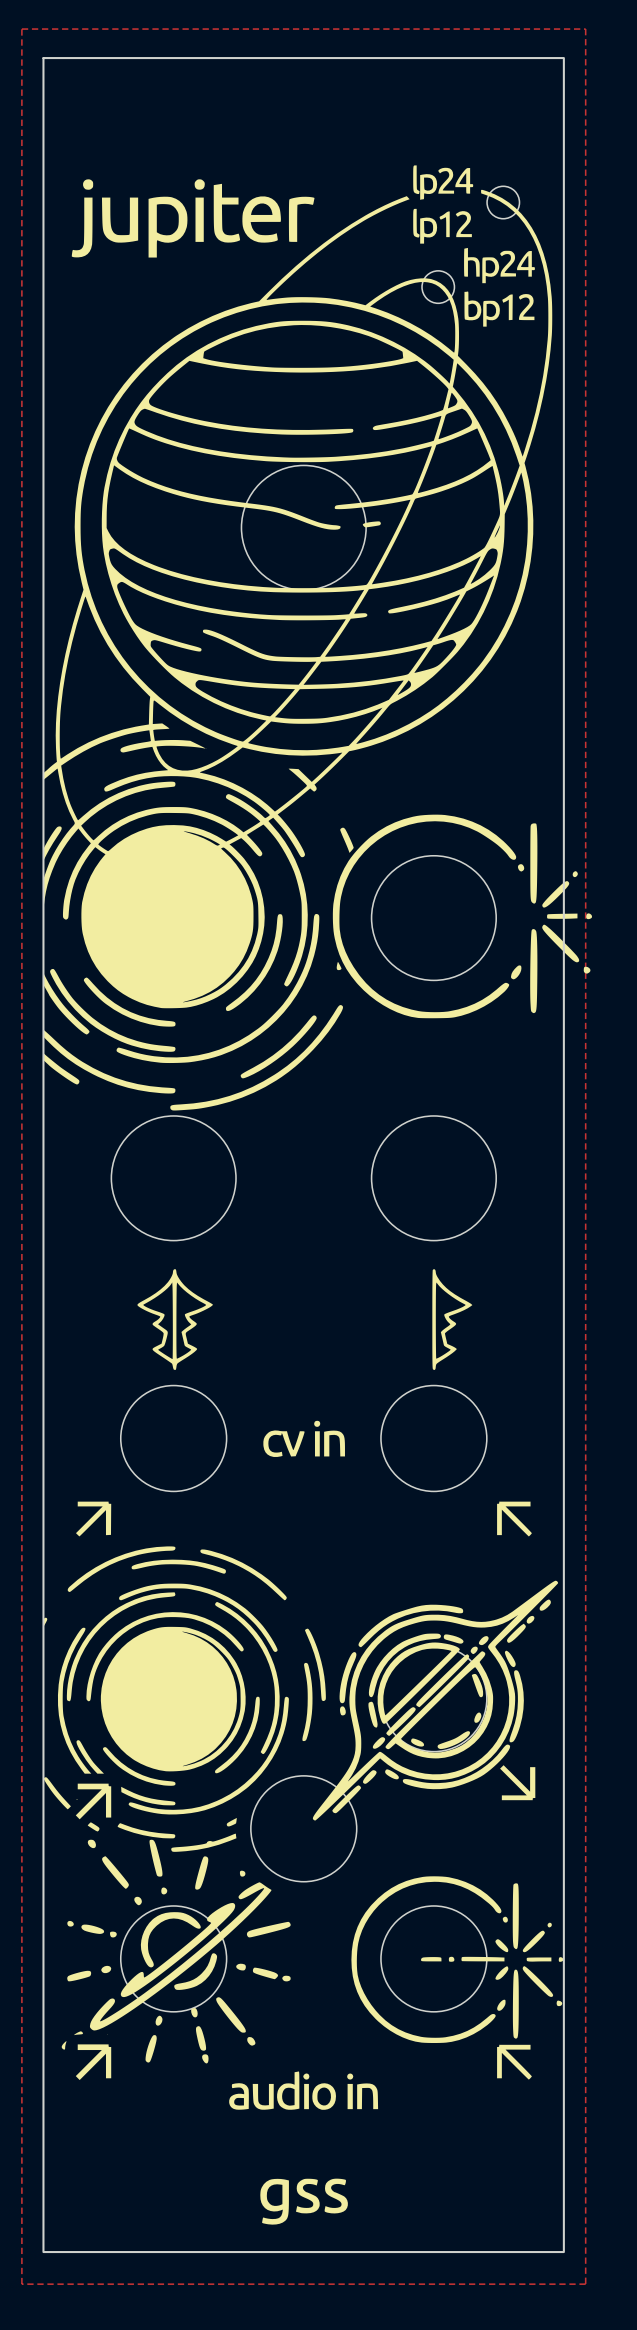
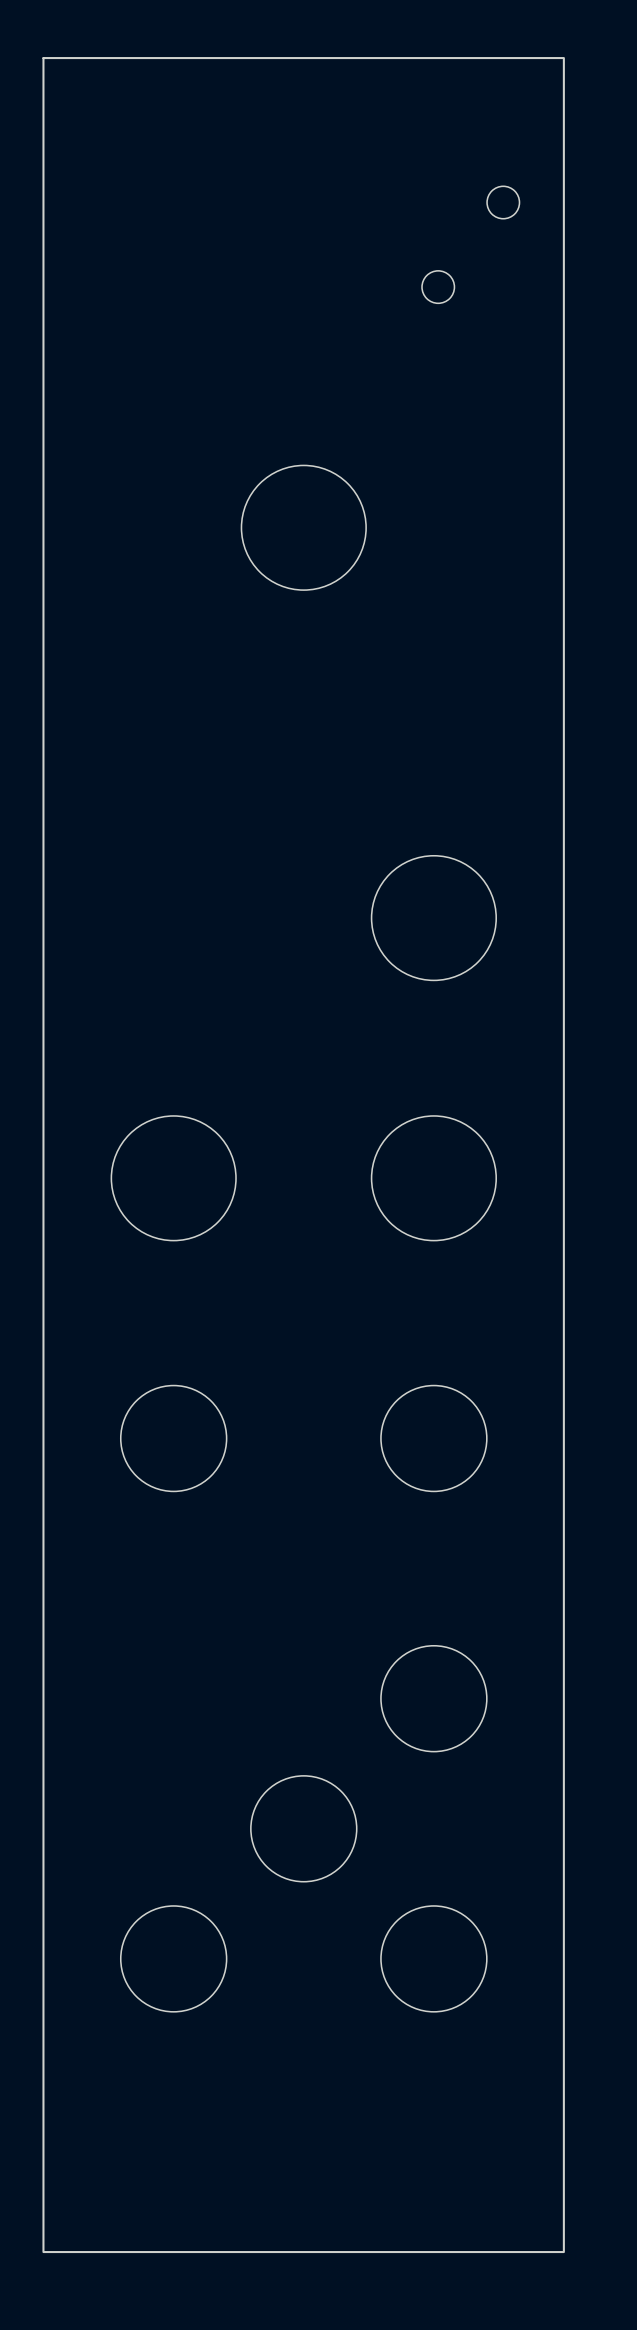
top zone outline: (21, 29) (585, 29) (585, 2284) (21, 2284) (21, 29) -> none
drawing: [43, 165, 593, 2225] -> none

